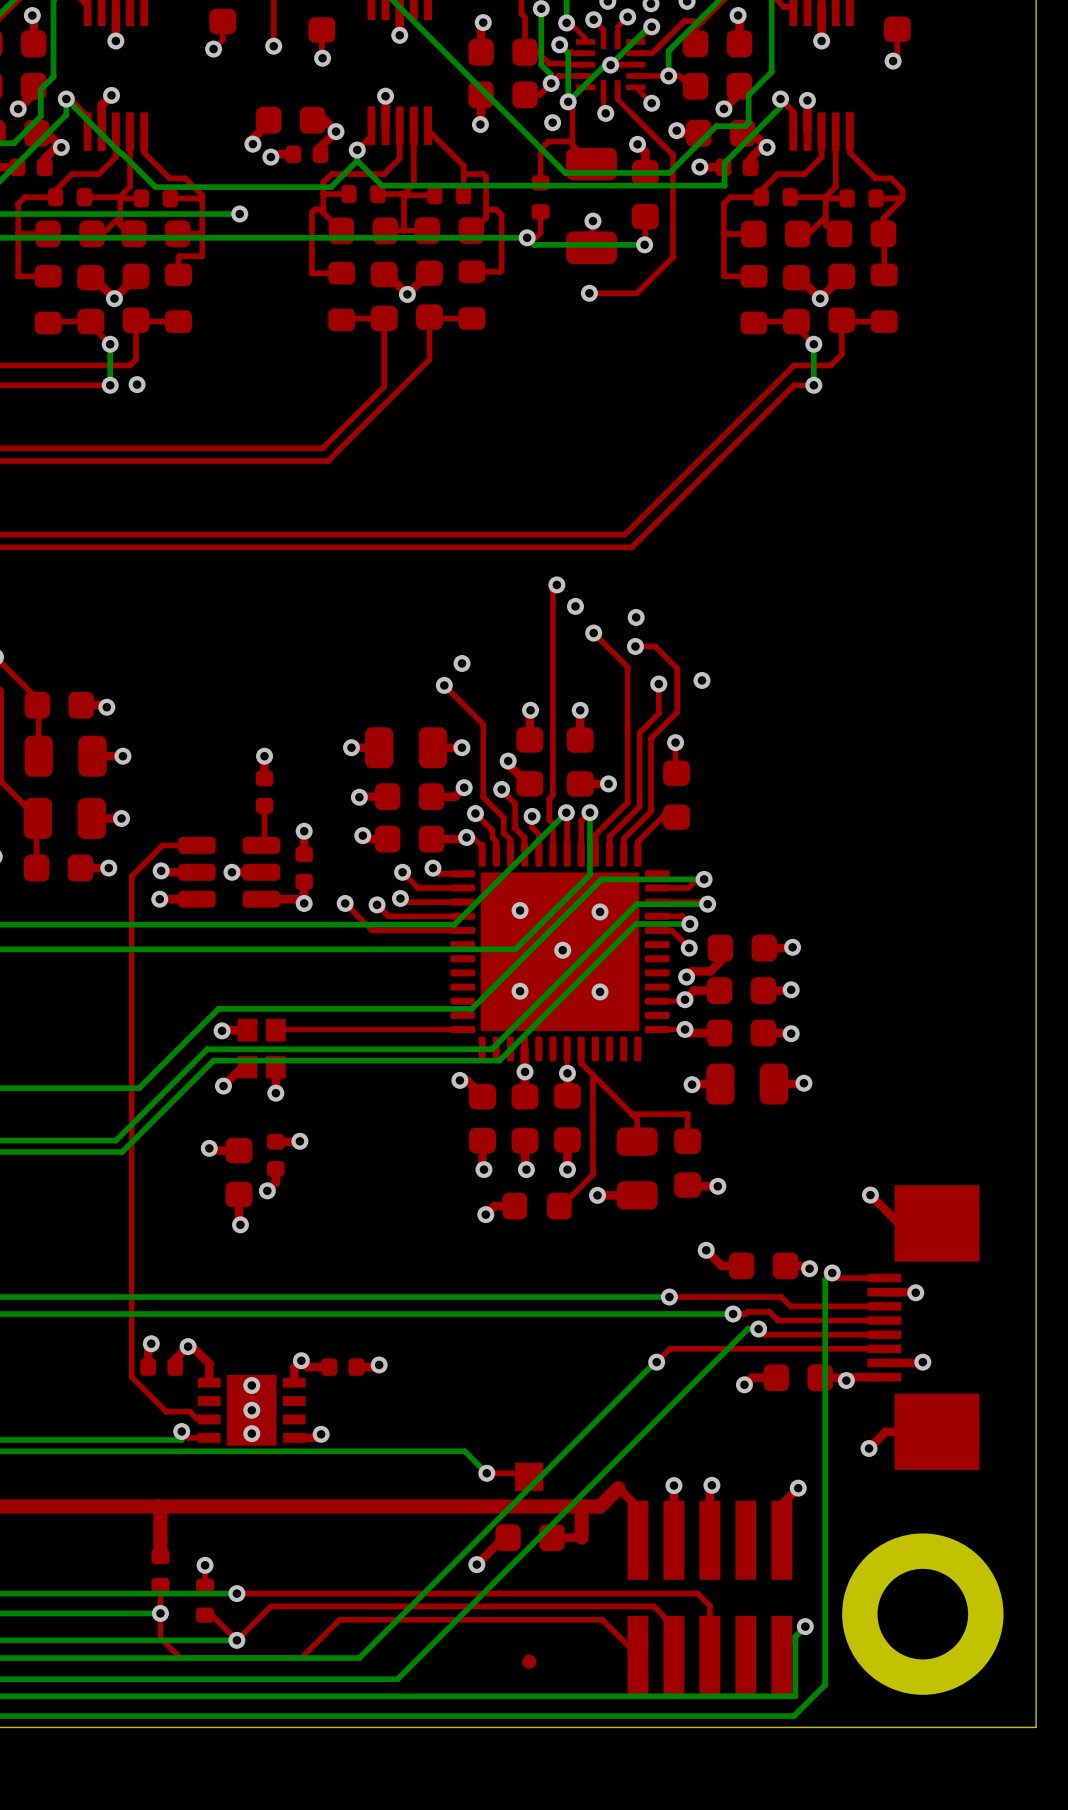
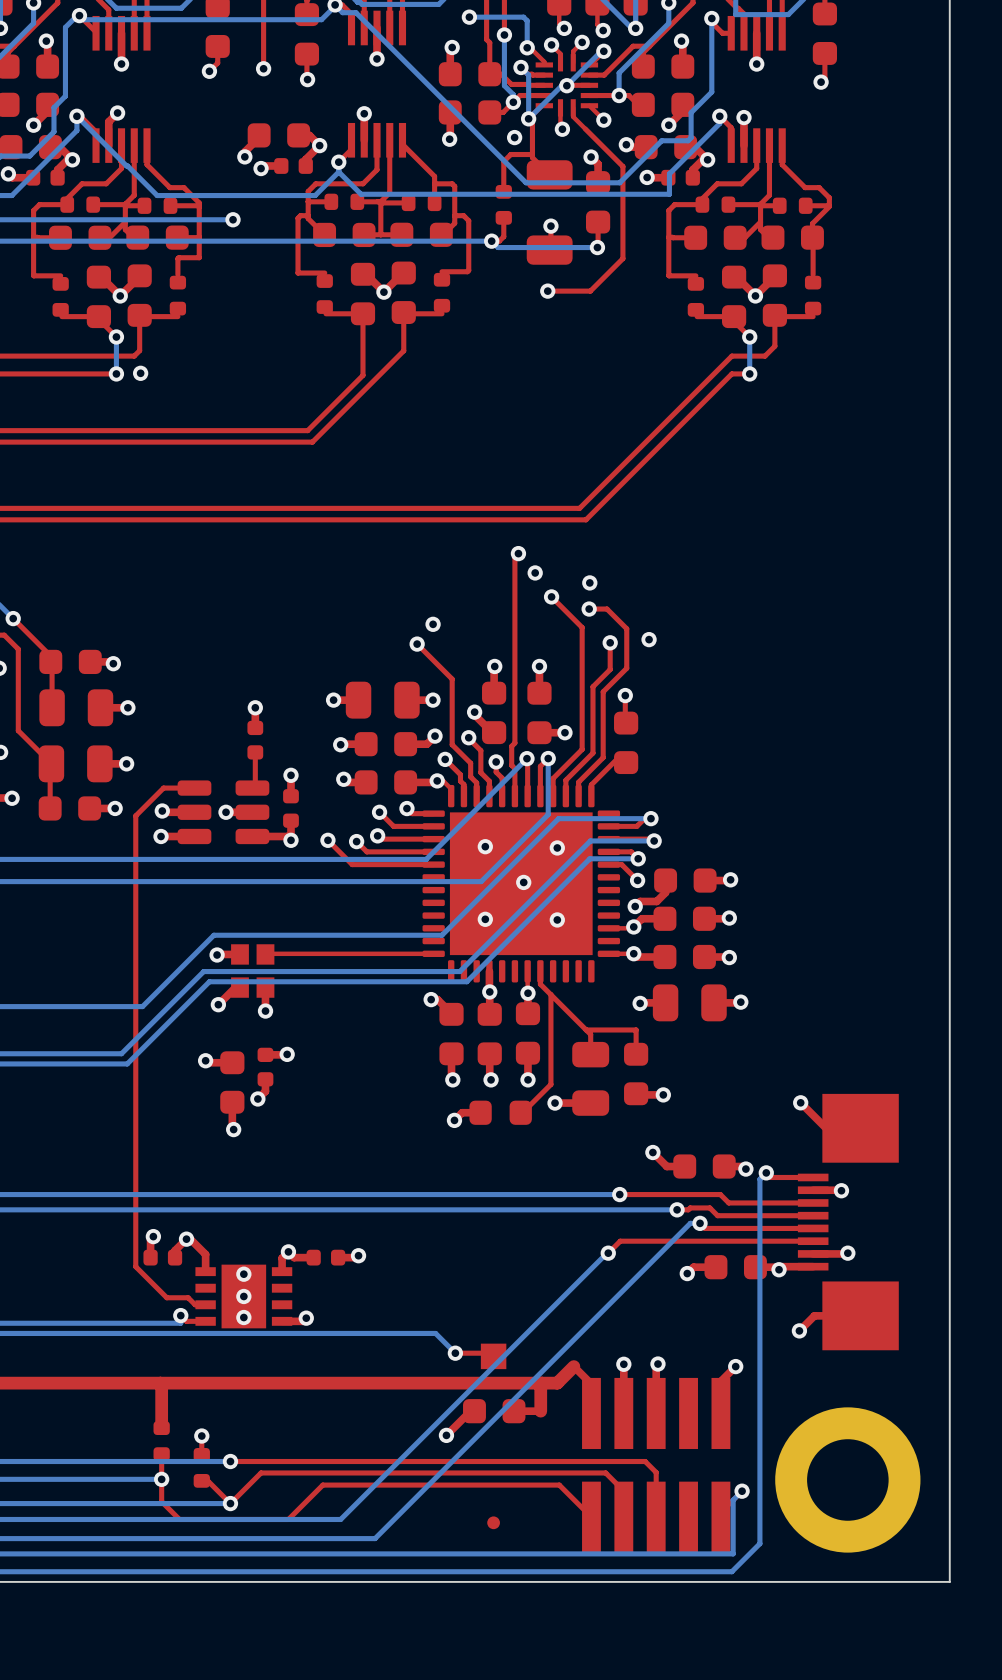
part footprint: [458, 260, 486, 330] -> [433, 272, 451, 313]
part footprint: [328, 261, 356, 332] -> [316, 274, 333, 314]
part footprint: [165, 263, 192, 333] -> [169, 275, 187, 316]
part footprint: [870, 263, 898, 333] -> [804, 275, 822, 316]
part footprint: [34, 264, 62, 335] -> [52, 276, 69, 317]
part footprint: [740, 264, 768, 335] -> [687, 276, 705, 317]

